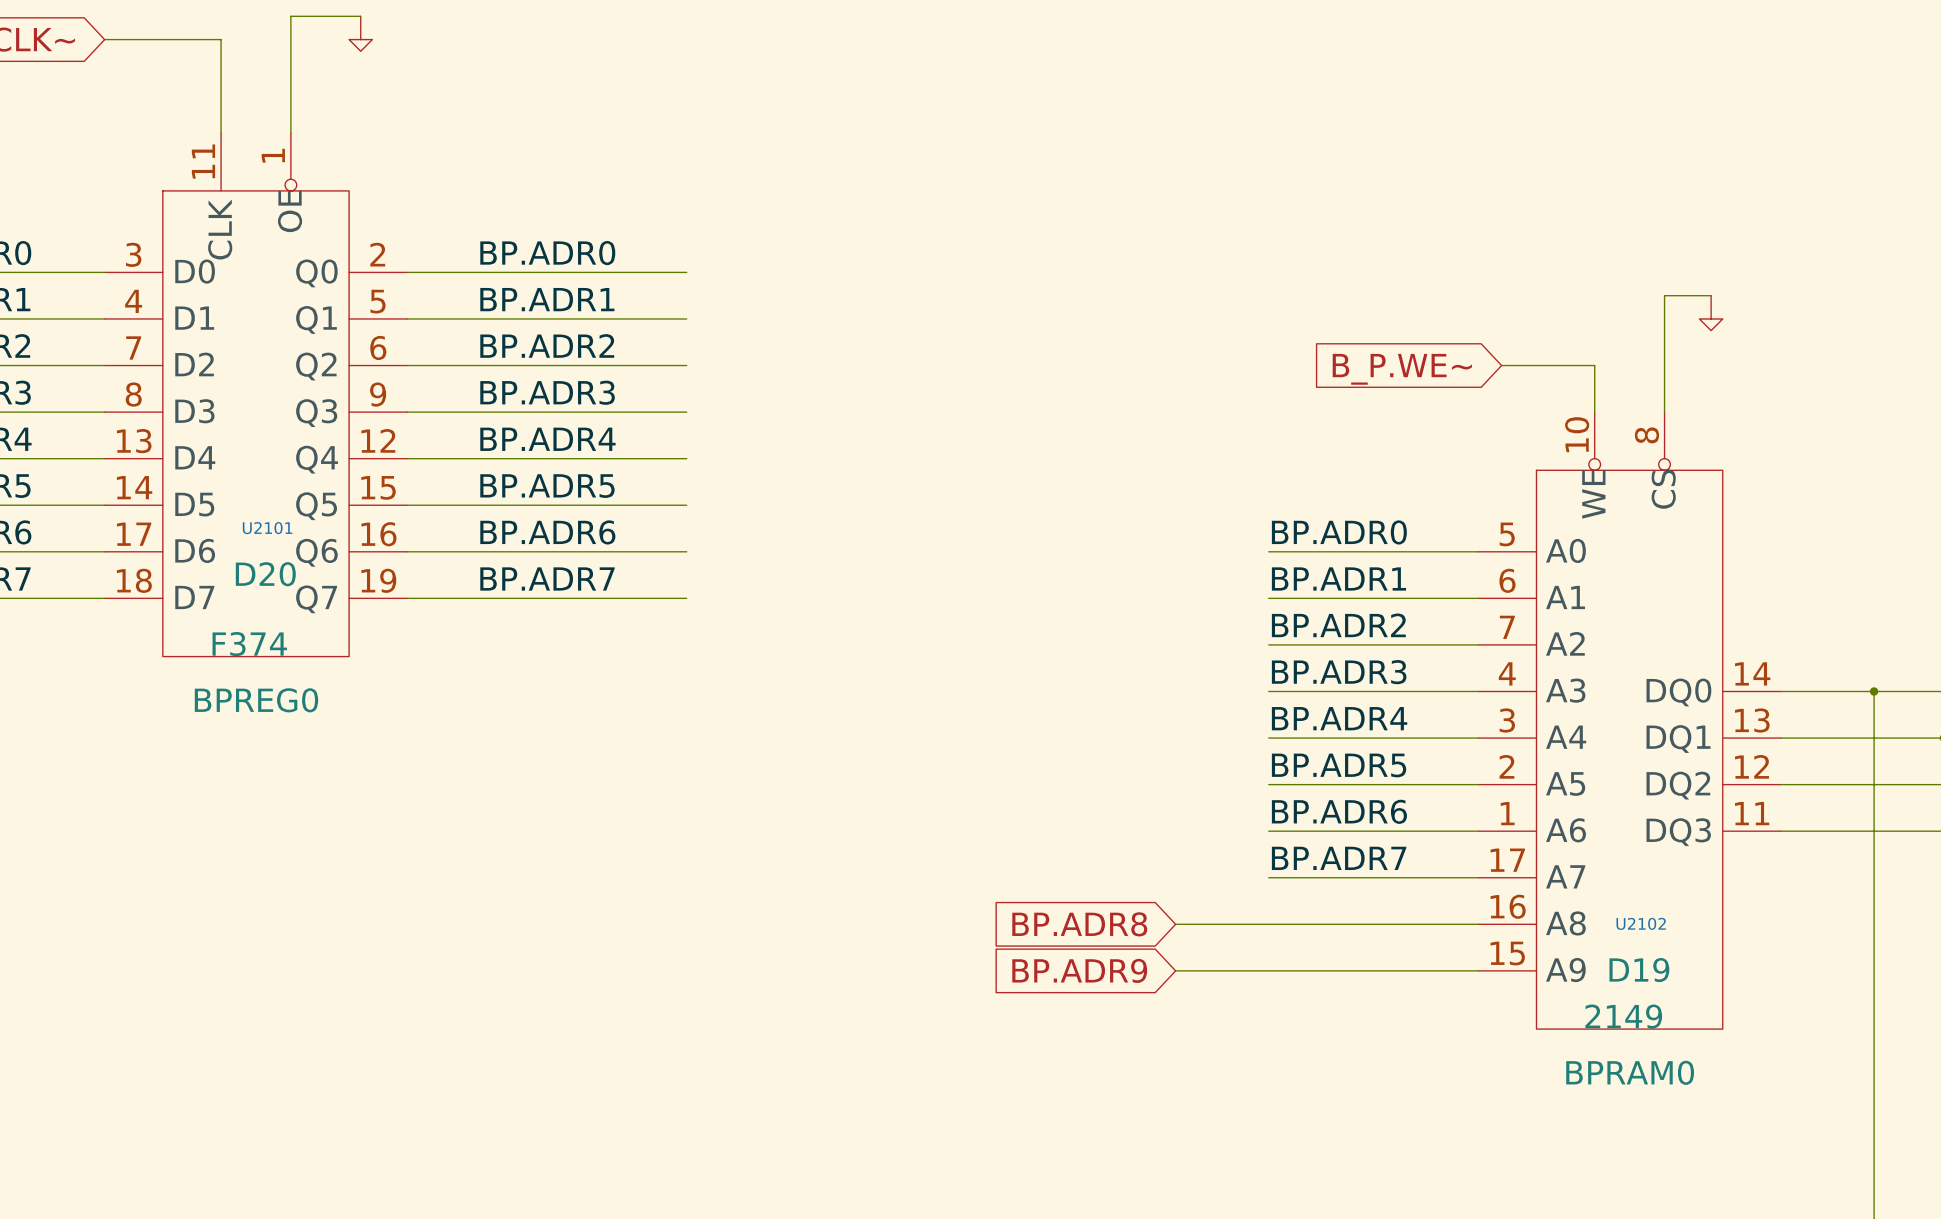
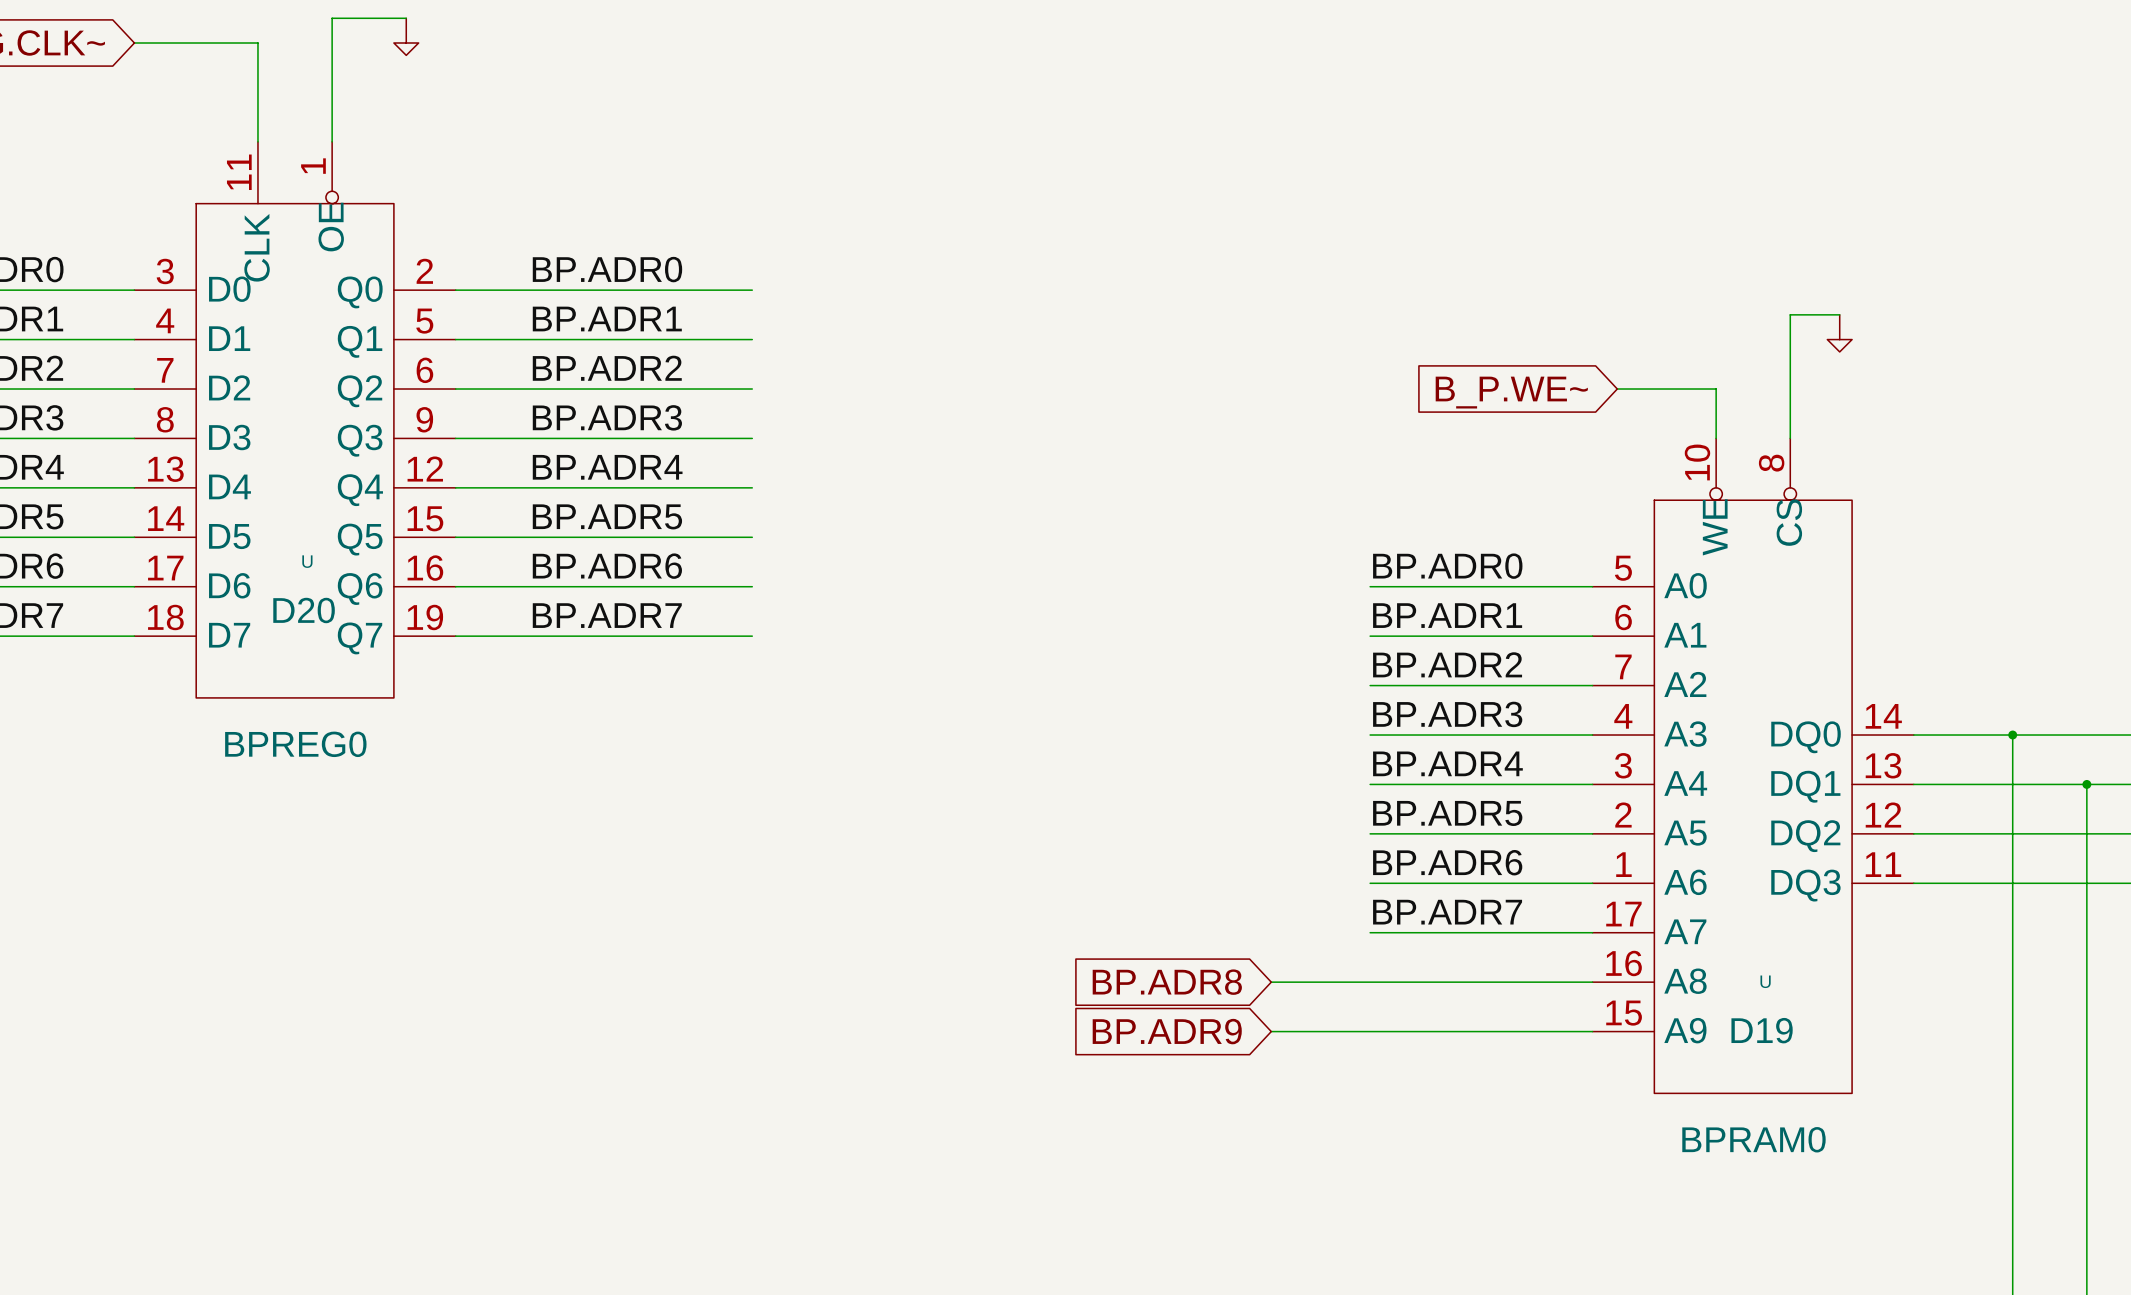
U2101 name: U2101 (267, 528) -> U (307, 561)
U2101 value: F374 (249, 644) -> none
U2102 name: U2102 (1641, 923) -> U (1765, 981)
U2102 value: 2149 (1623, 1016) -> none

